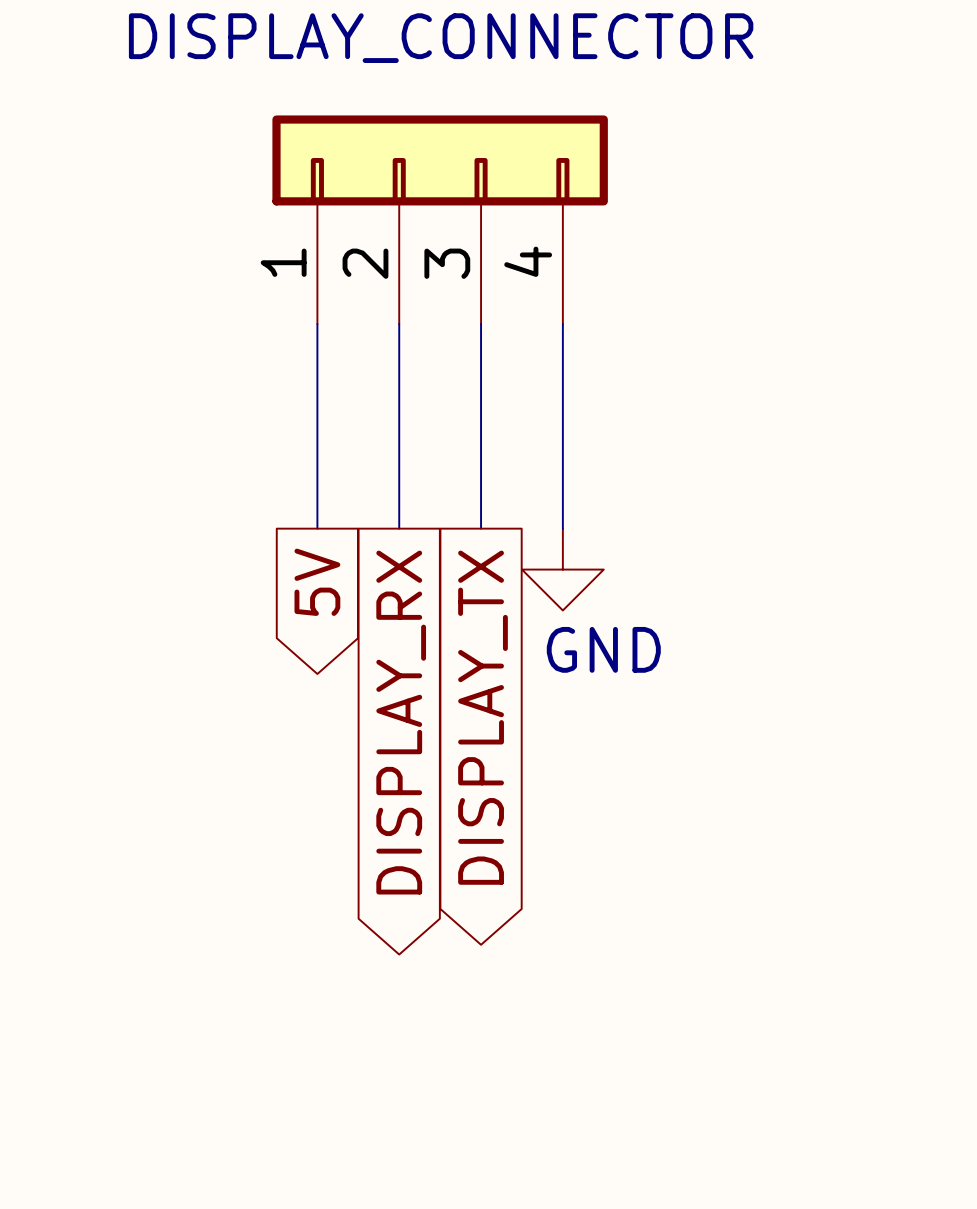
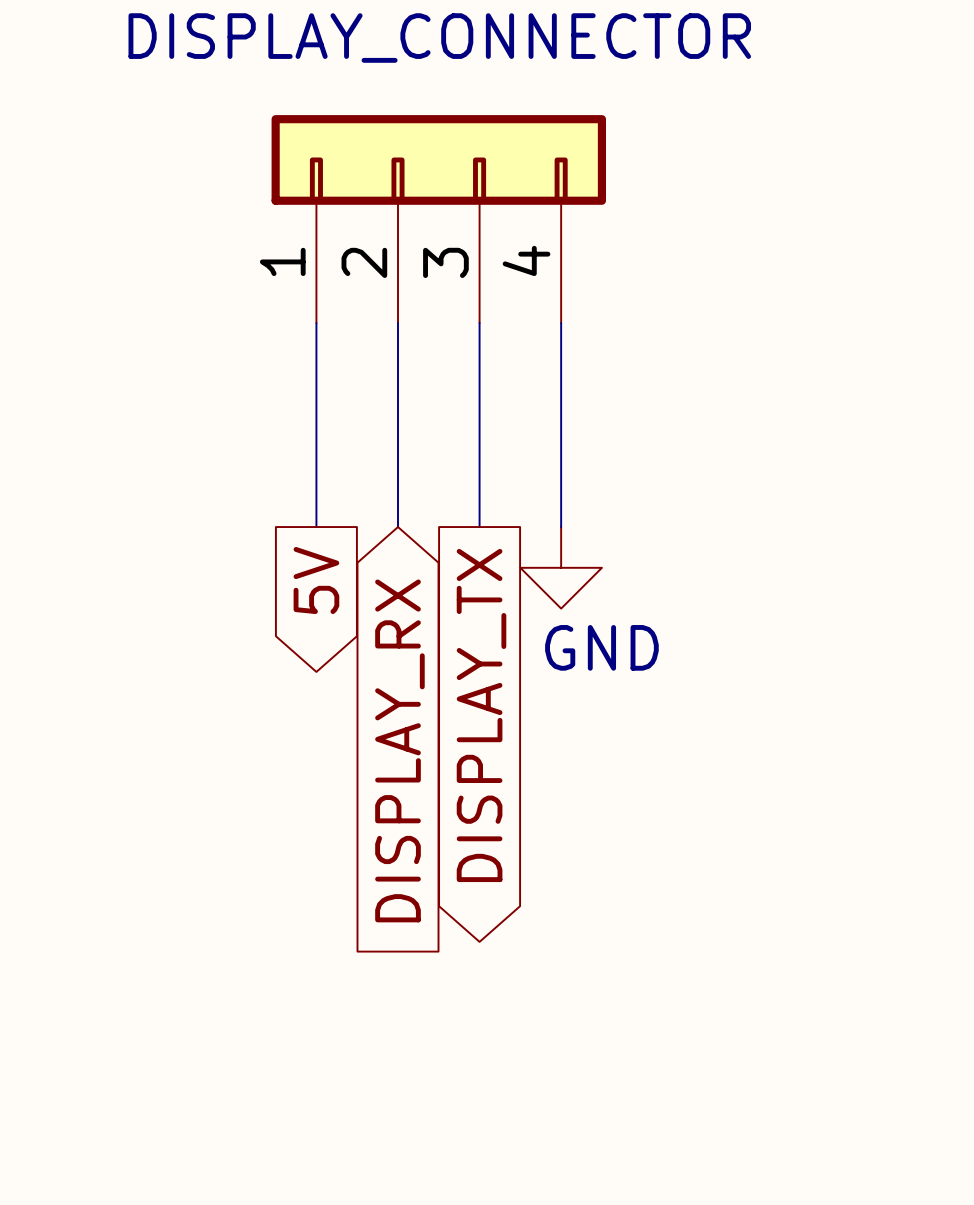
global label shape: output (401, 722) -> input (399, 750)

